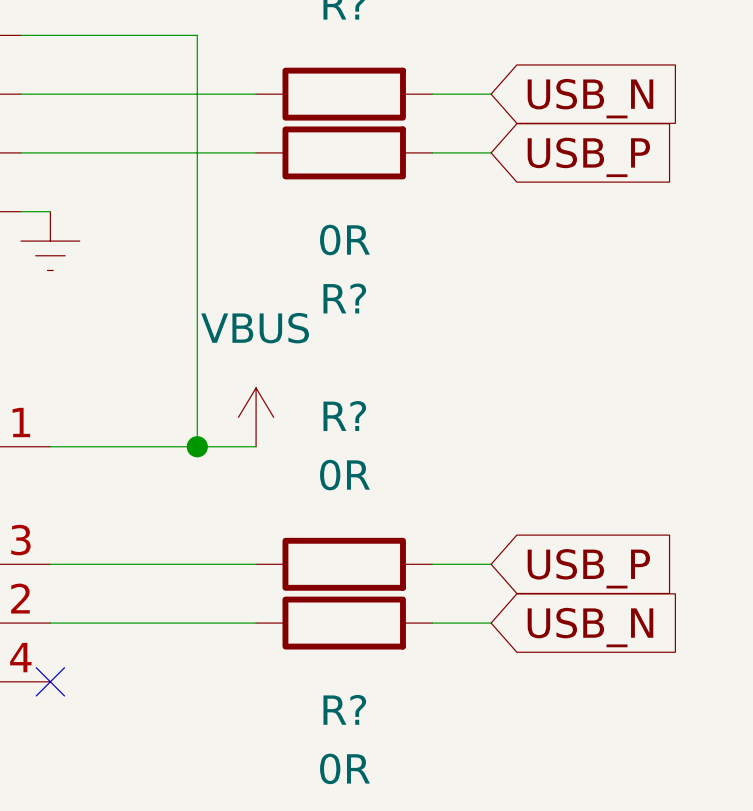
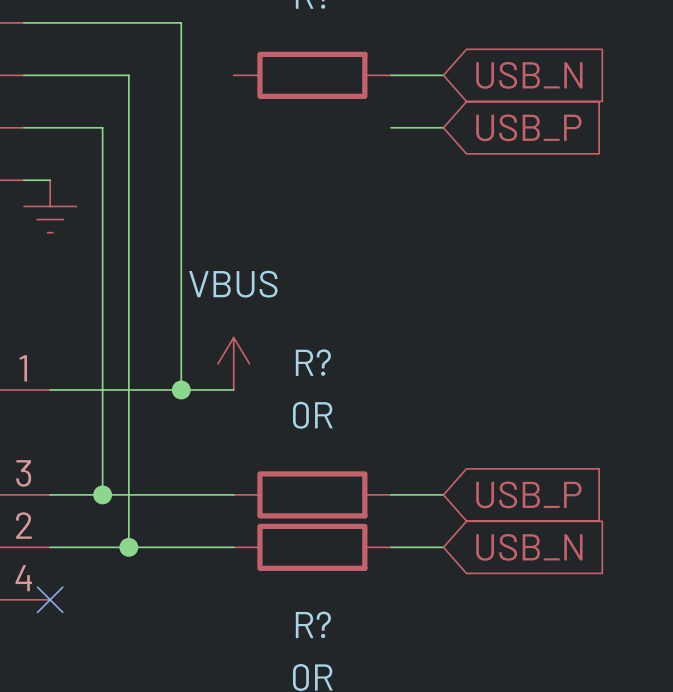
wire: (138, 94) (256, 94) -> (128, 75) (128, 547)
wire: (109, 152) (256, 152) -> (102, 127) (102, 494)
R?: 0R (344, 152) -> none
junction: none -> (102, 494)
junction: none -> (128, 547)

